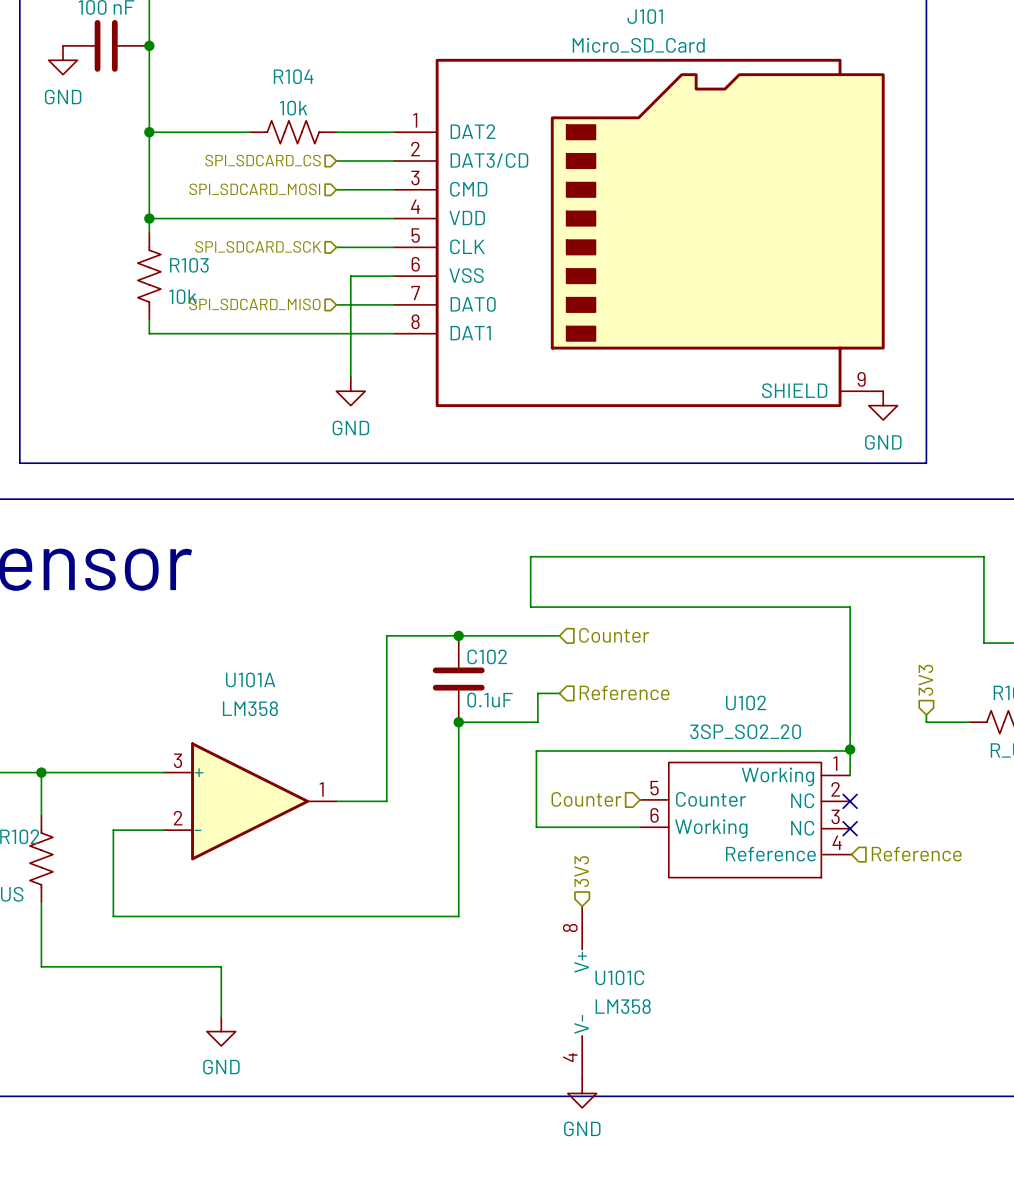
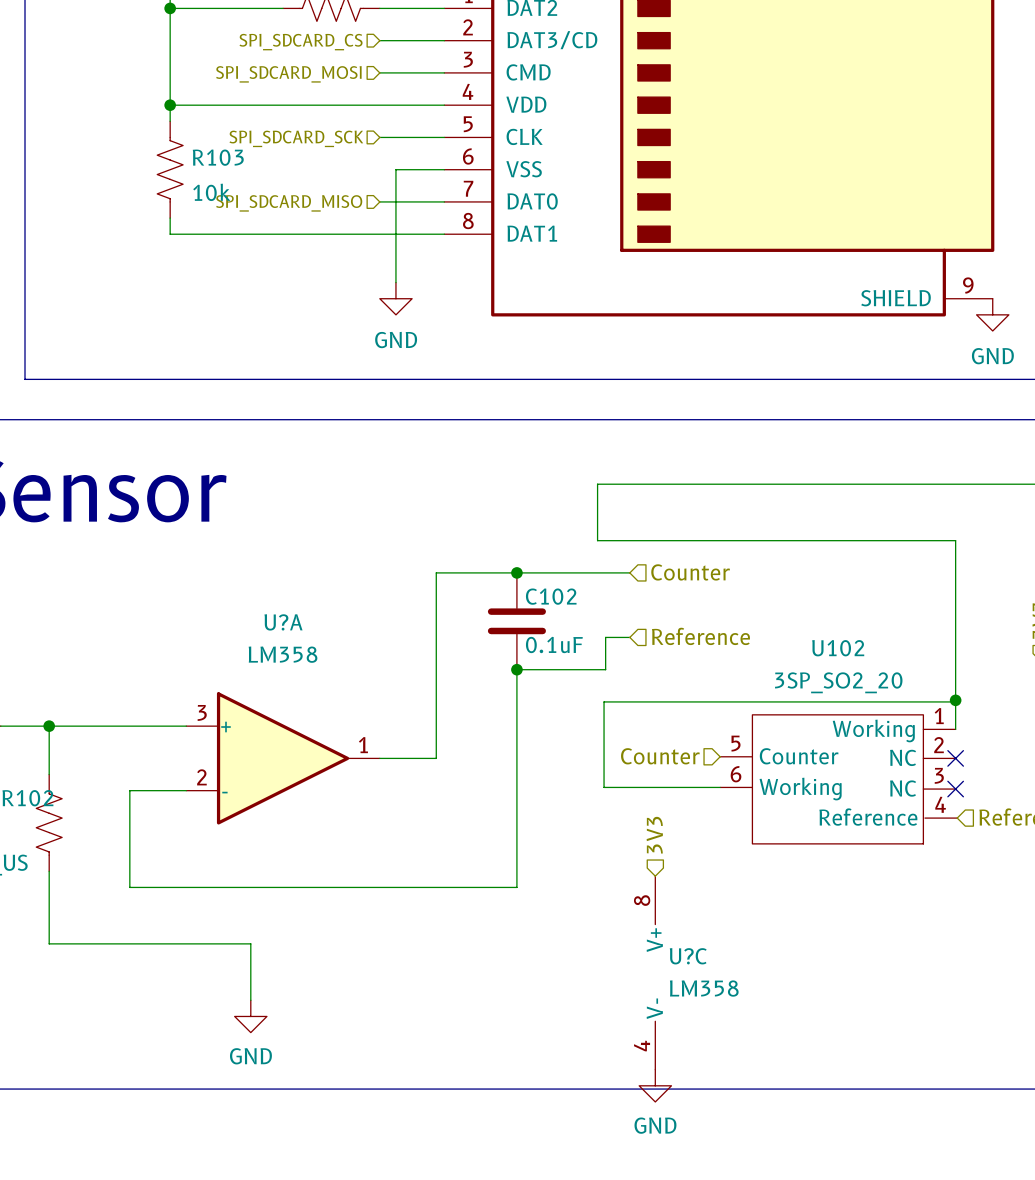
U101A name: U101A (250, 679) -> U?A (283, 622)
U101C name: U101C (619, 977) -> U?C (688, 956)

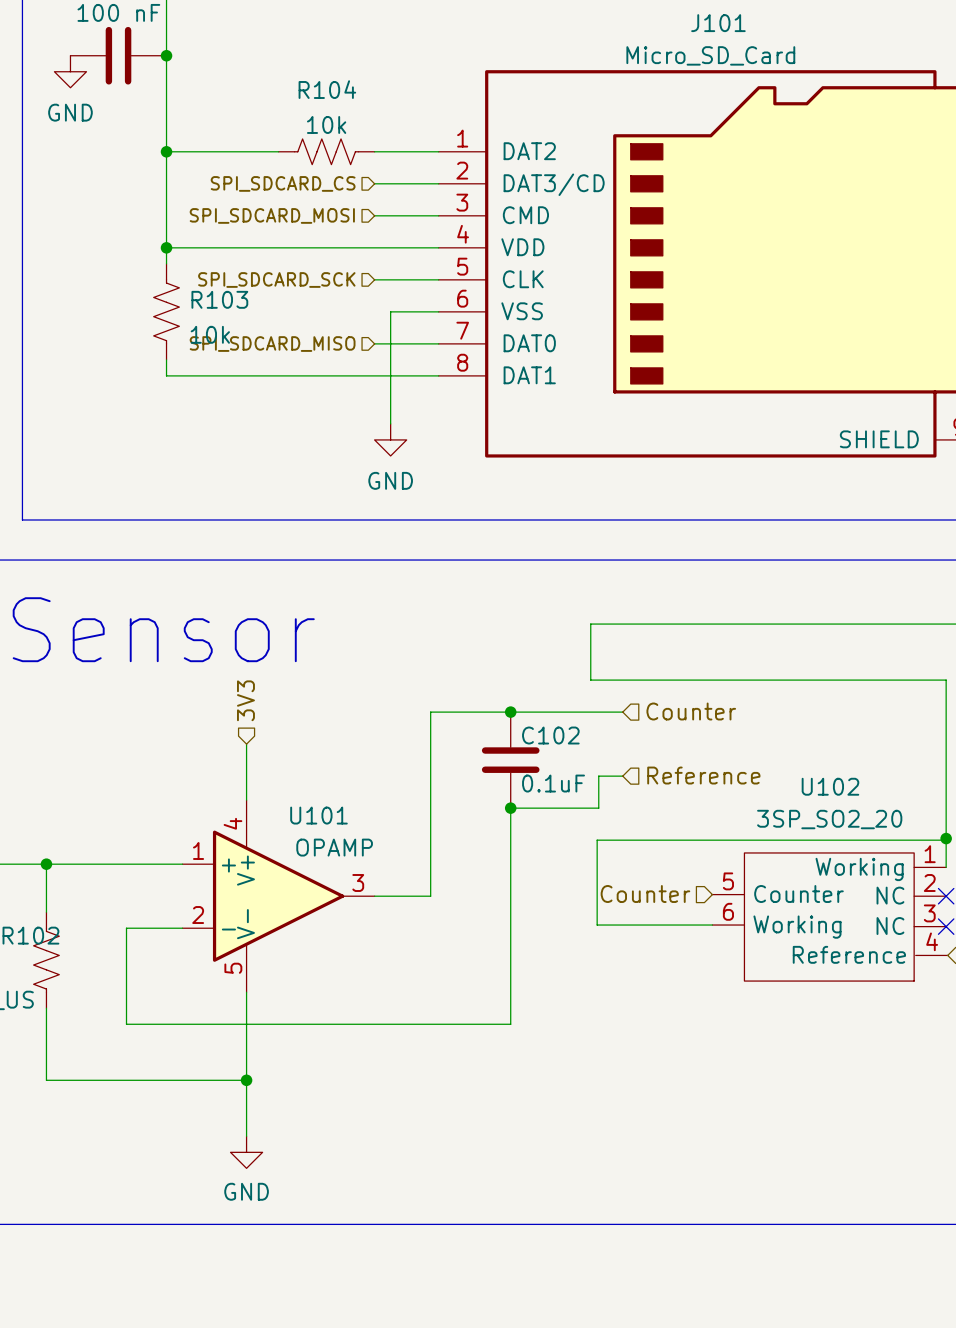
hierarchical label: none -> 3V3 (245, 700)
wire: none -> (246, 744) (246, 800)
U?A: LM358 (283, 758) -> none
U101: none -> OPAMP (278, 896)
hierarchical label: 3V3 (654, 835) -> none
wire: none -> (246, 992) (246, 1080)
junction: none -> (246, 1080)
U?C: LM358 (655, 972) -> none
power symbol: GND (655, 1085) -> none

